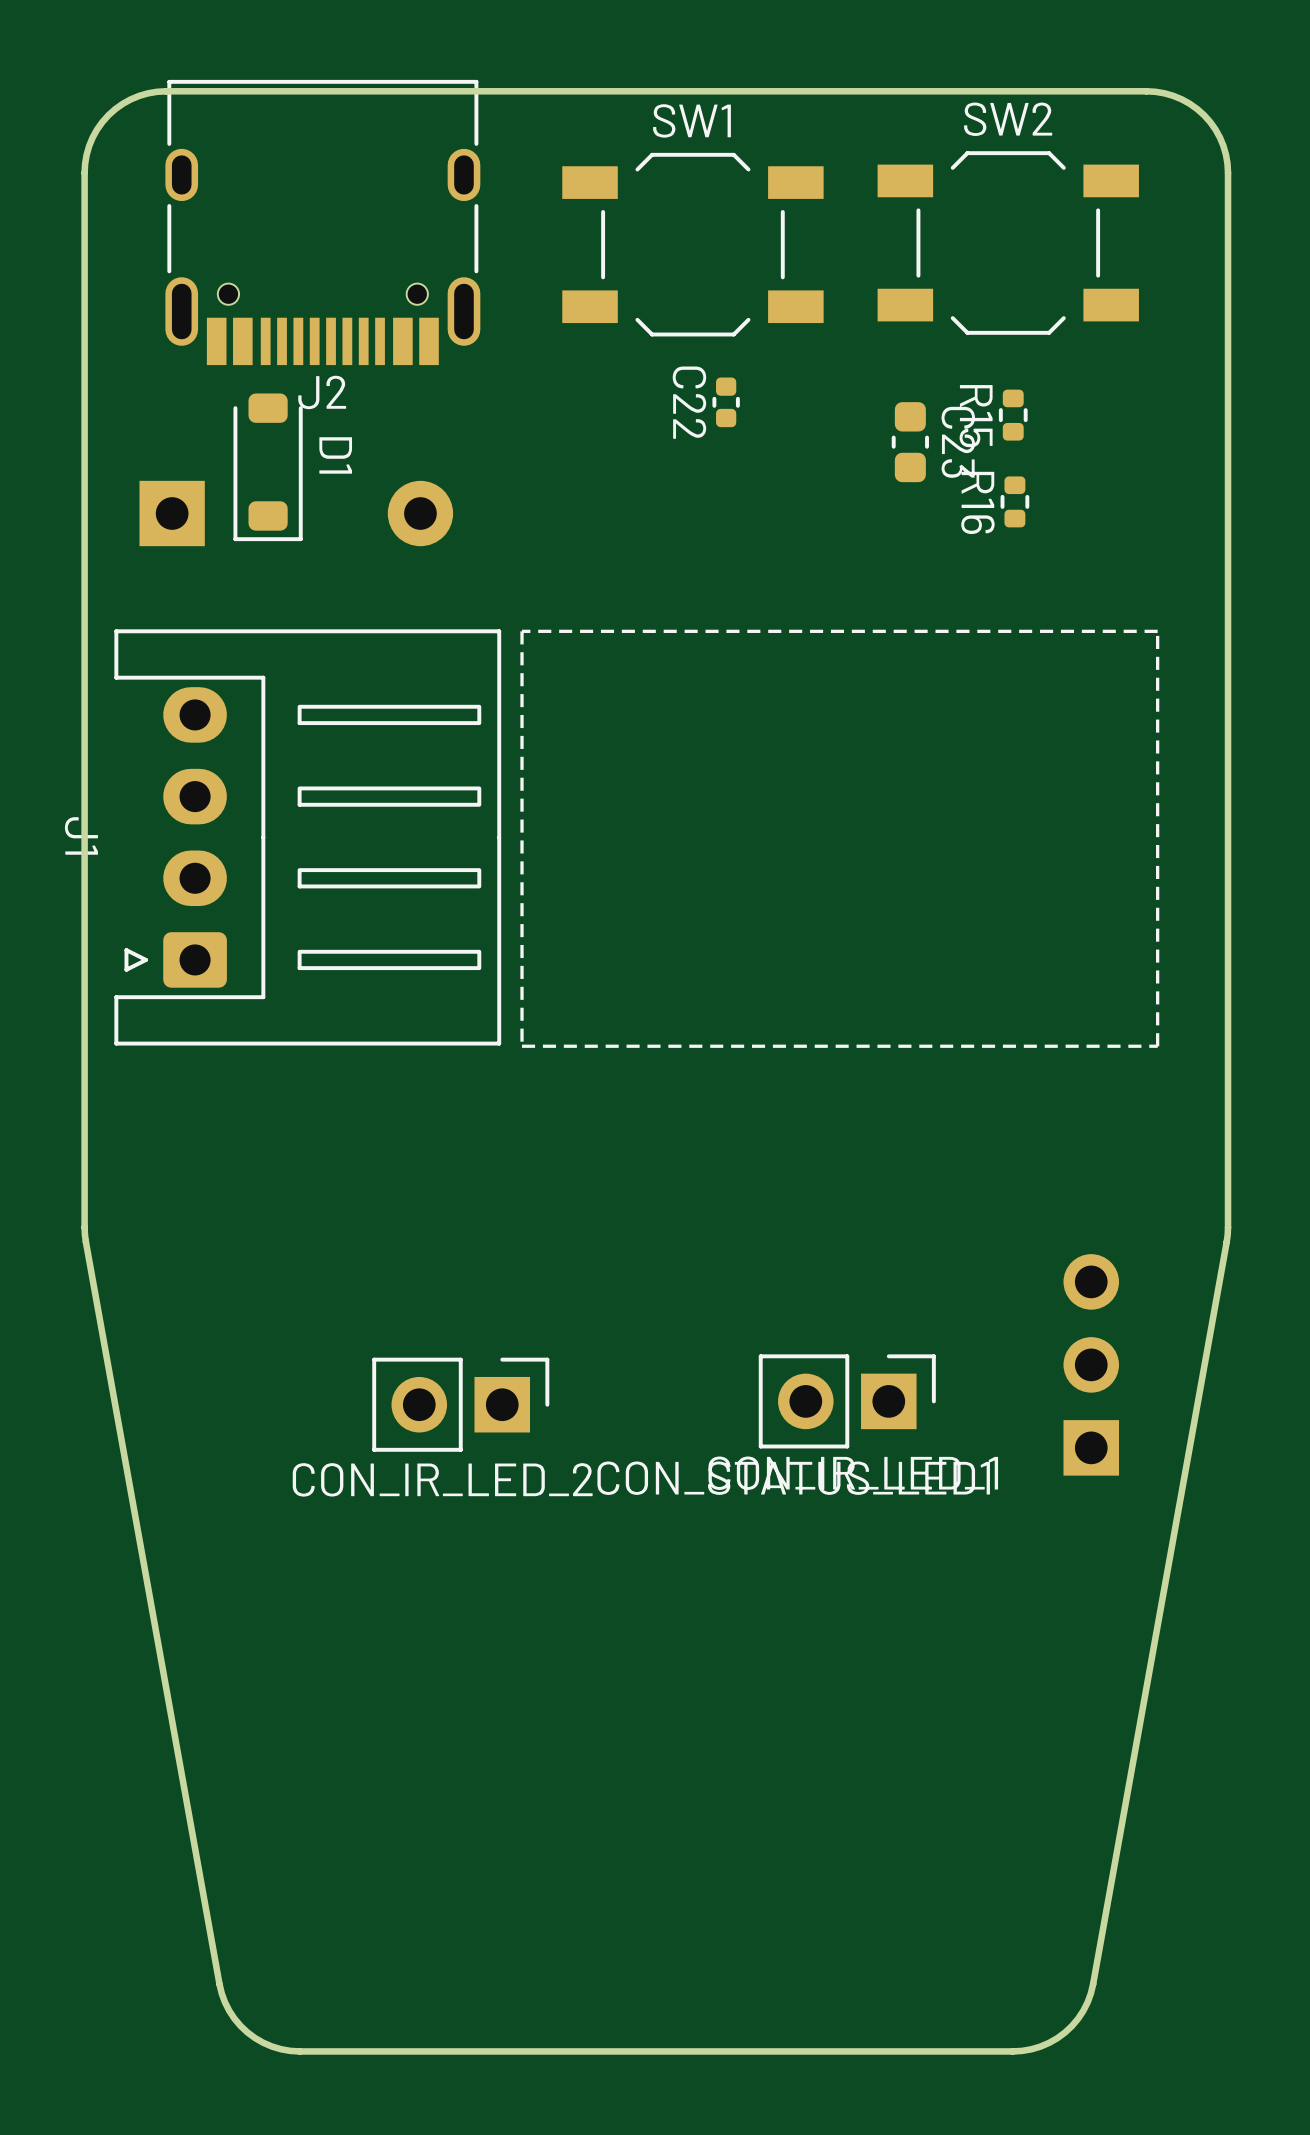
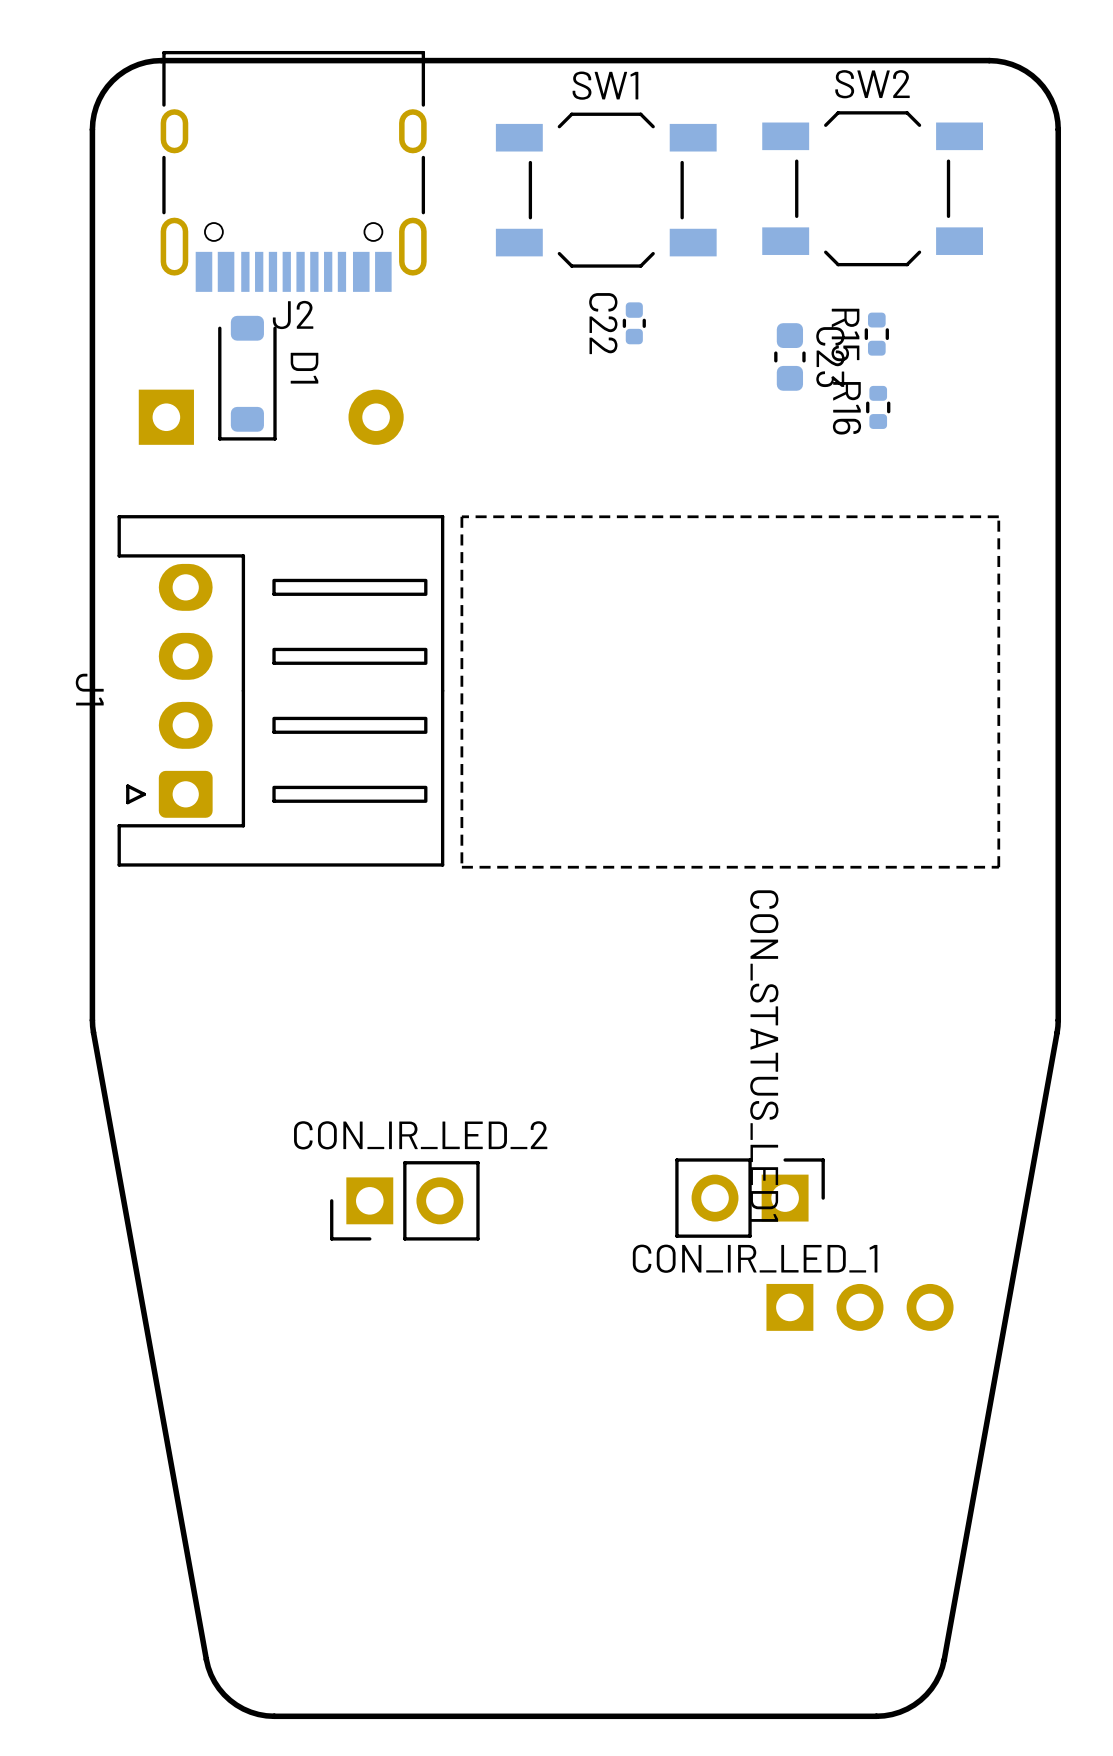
CON_STATUS_LED1 rotation: 0° (1091, 1364) -> 90° clockwise (860, 1307)
CON_STATUS_LED1 position: (1091, 1364) -> (860, 1307)
CON_IR_LED_1 position: (847, 1401) -> (750, 1198)
CON_IR_LED_2 rotation: 0° (460, 1404) -> 180° (404, 1200)

